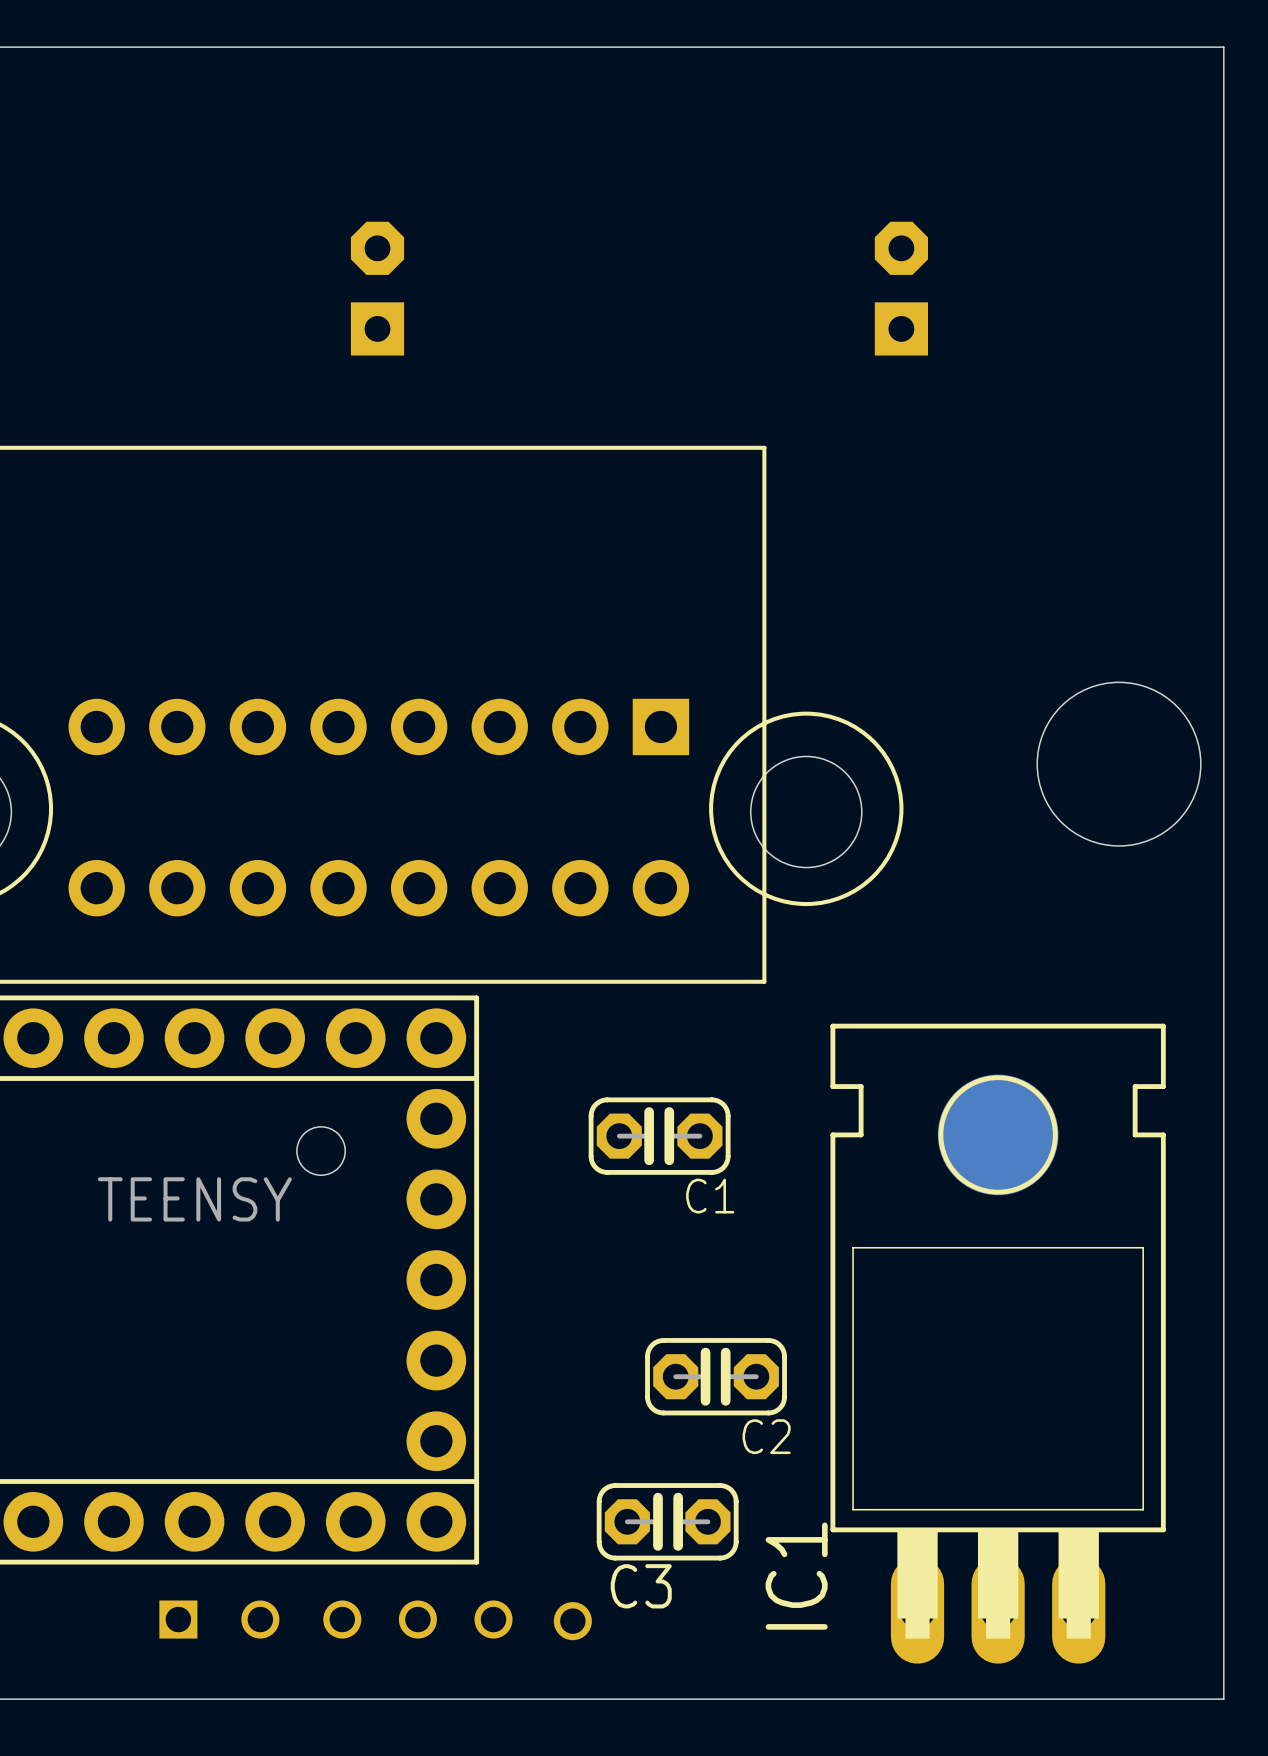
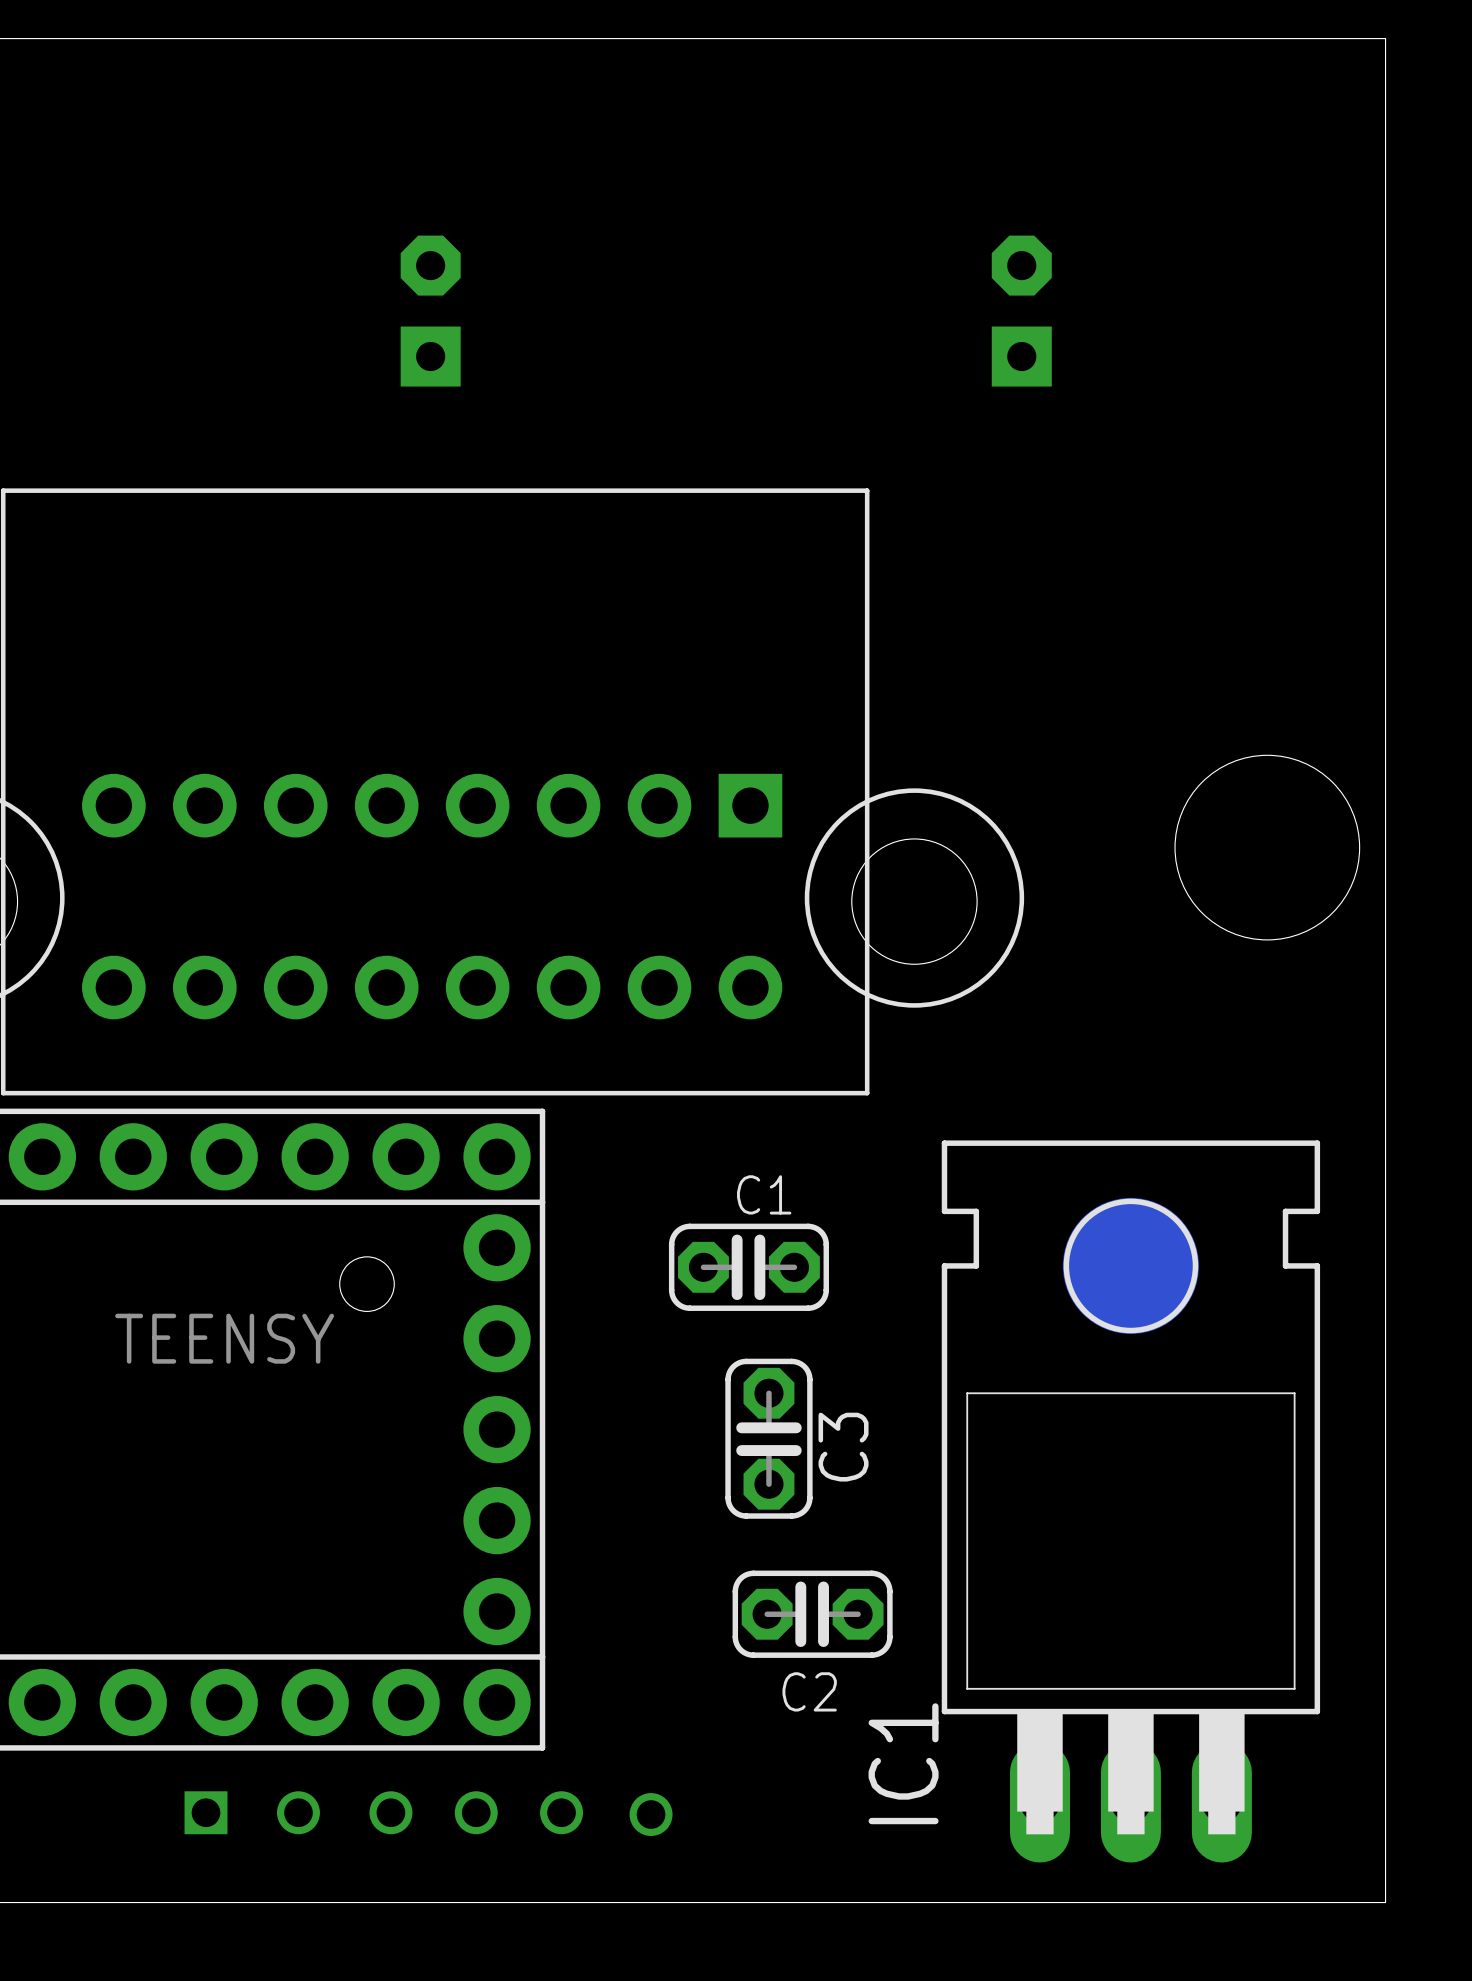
C1 name position: C1 (710, 1196) -> C1 (764, 1194)
C2 position: (716, 1376) -> (812, 1614)
C2 name position: C2 (766, 1436) -> C2 (809, 1691)
C3 rotation: 0° (667, 1521) -> 90° clockwise (768, 1438)
C3 position: (667, 1521) -> (768, 1438)
C3 name position: C3 (641, 1586) -> C3 (843, 1447)

